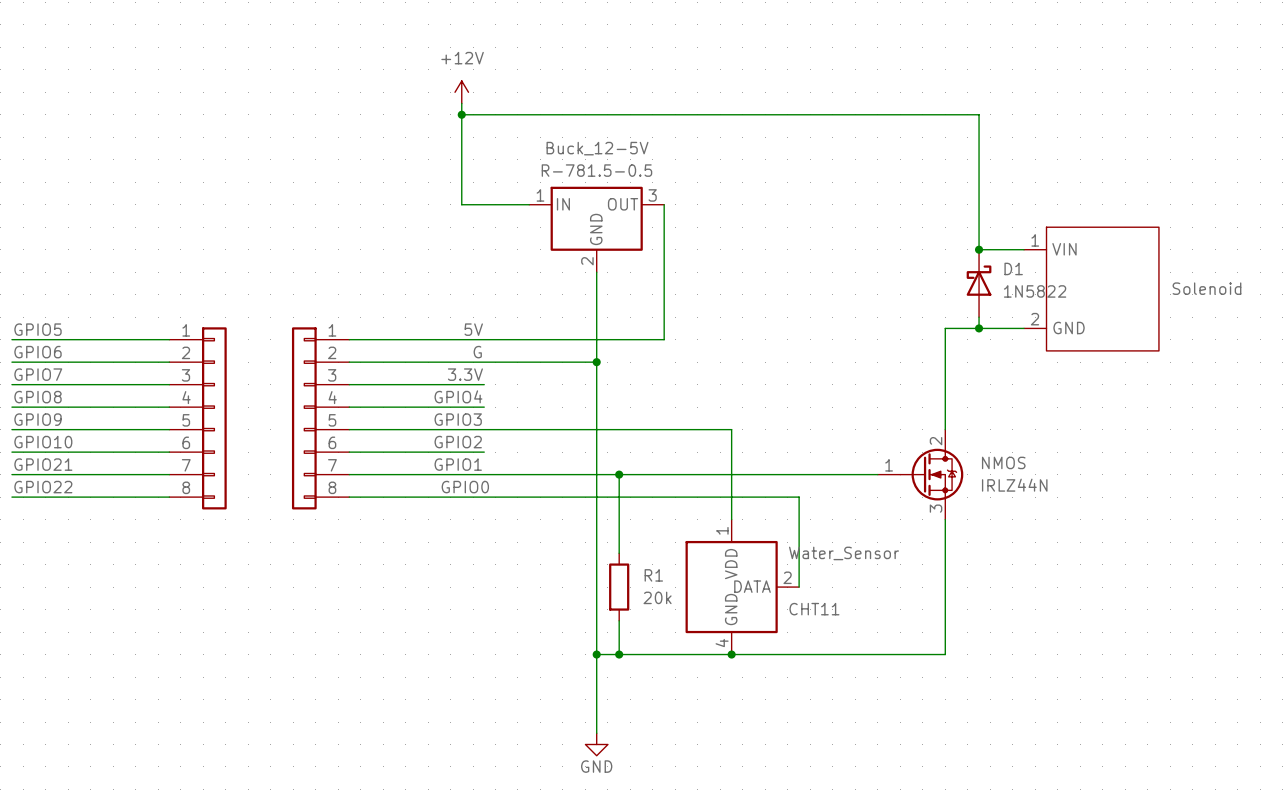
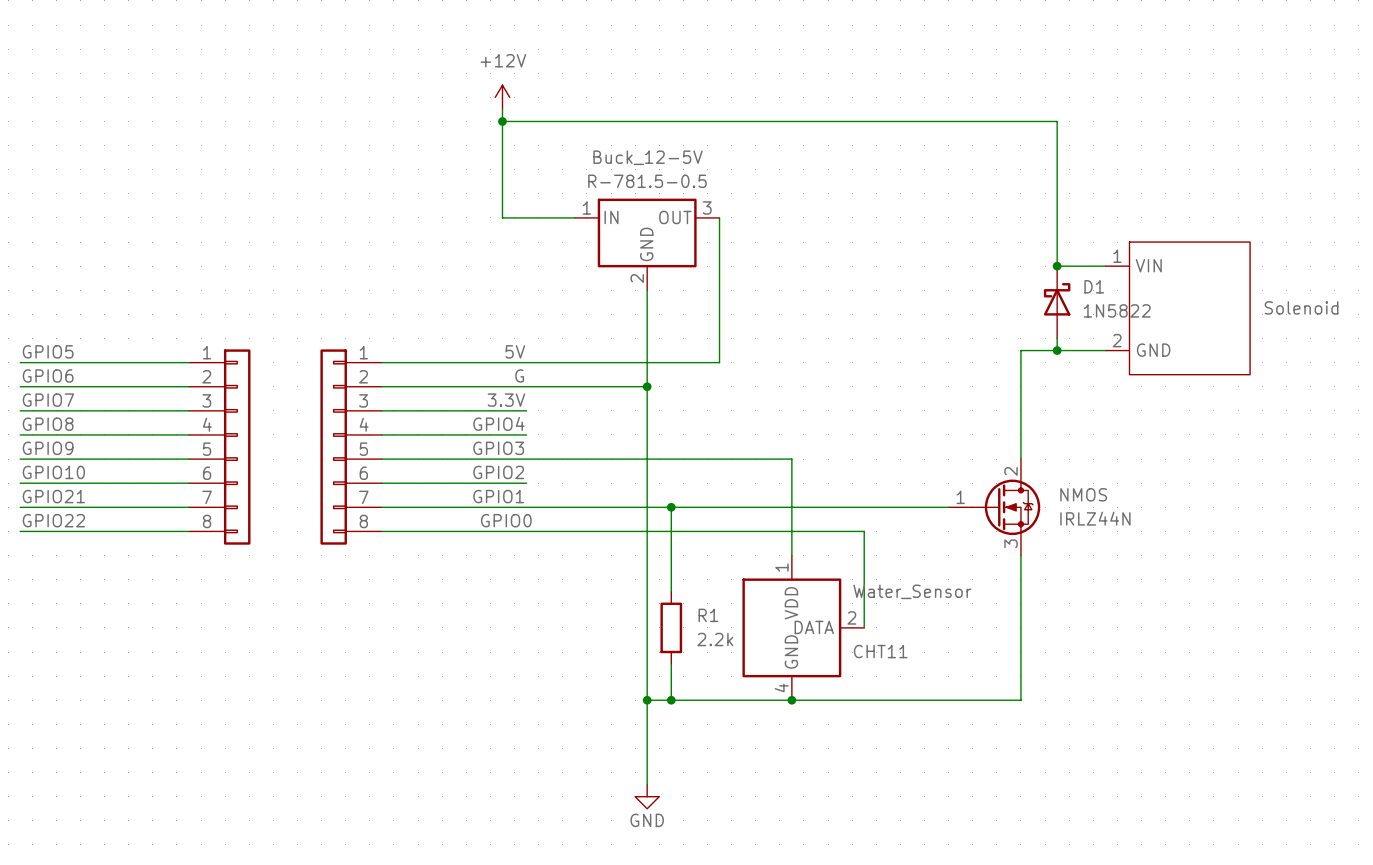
R1 value: 20k (657, 597) -> 2.2k (715, 639)

